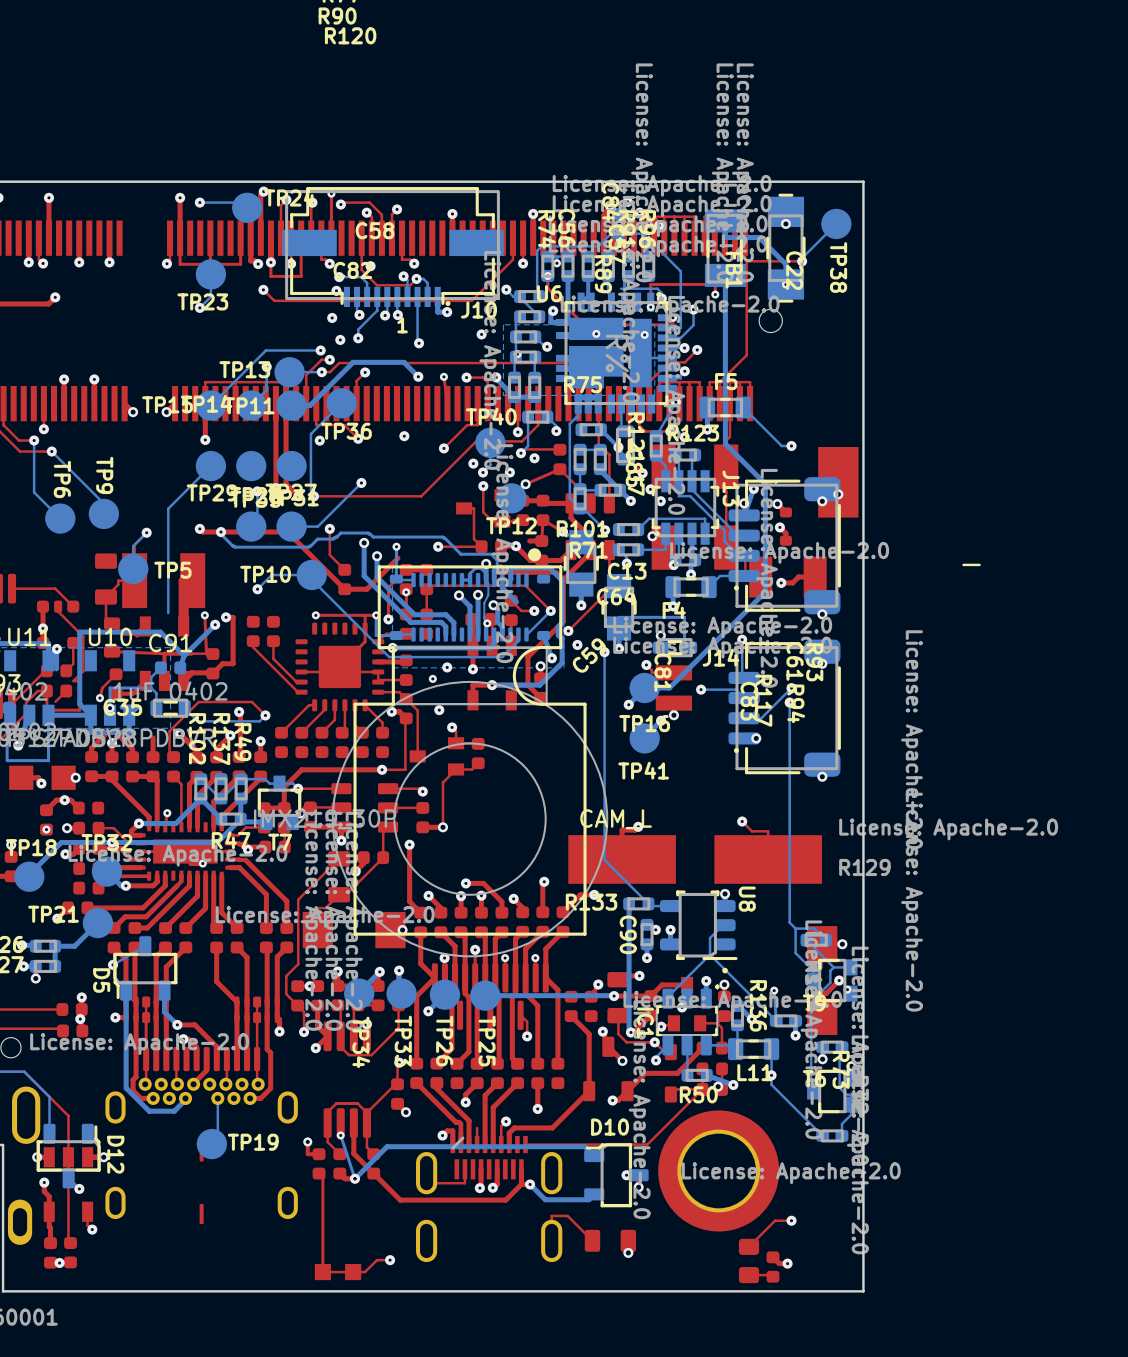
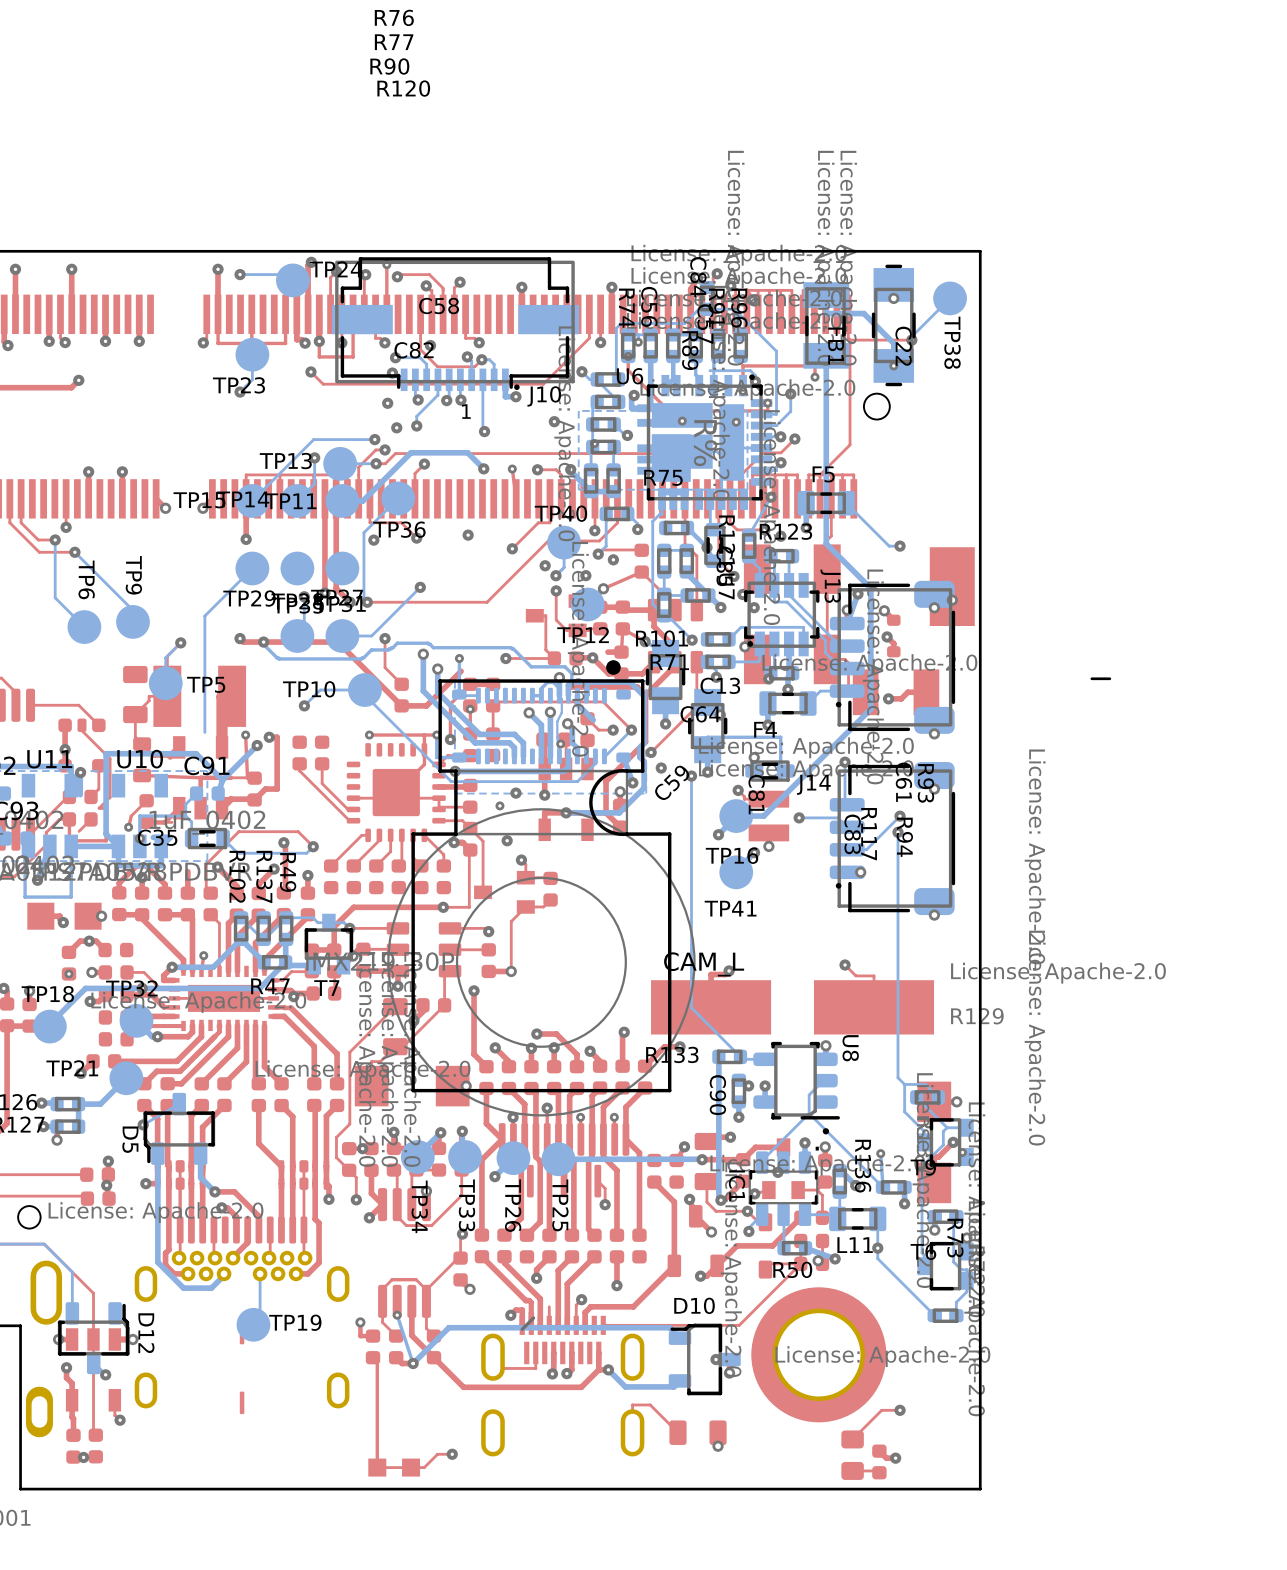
top track: (202, 863) (190, 863) -> none
via: (202, 863) -> none

